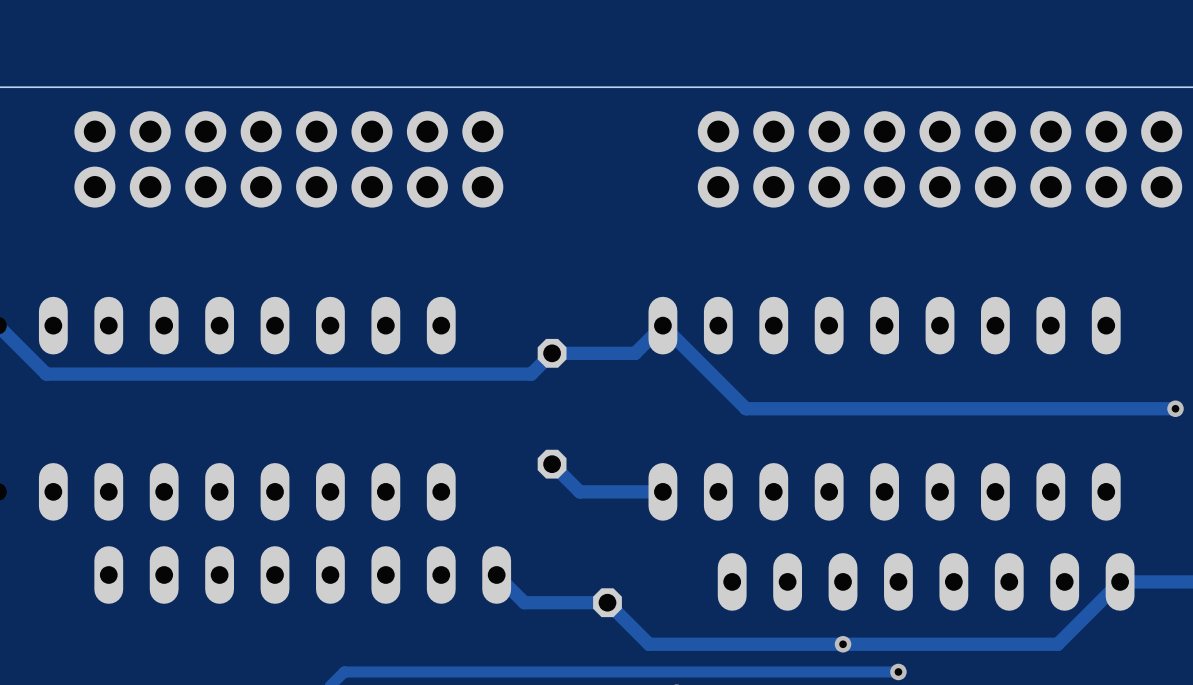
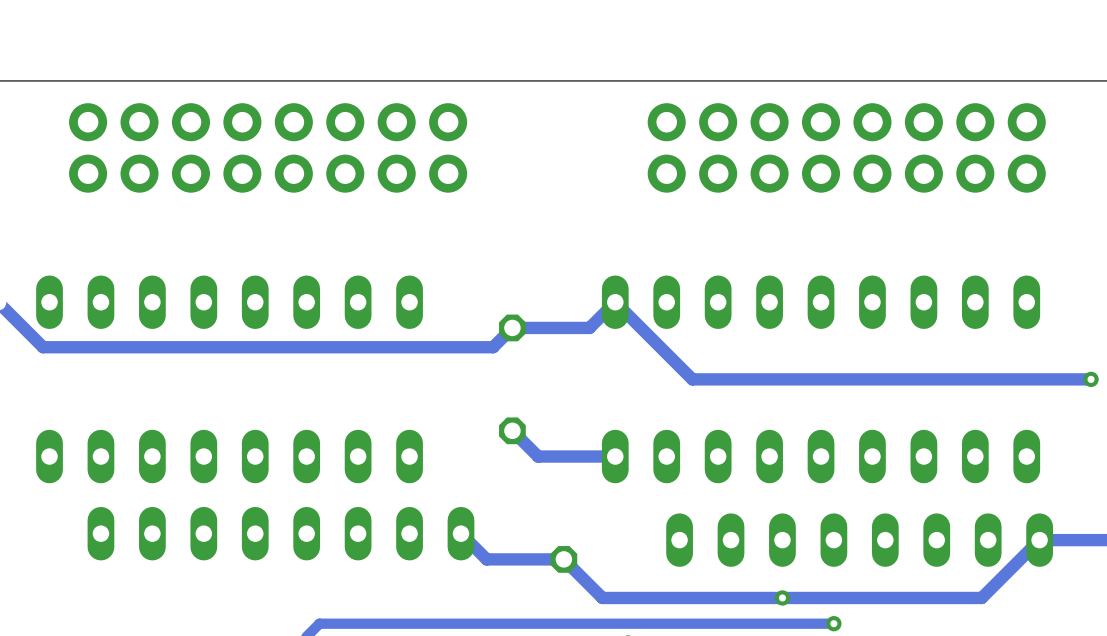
part: (1161, 159) -> none

